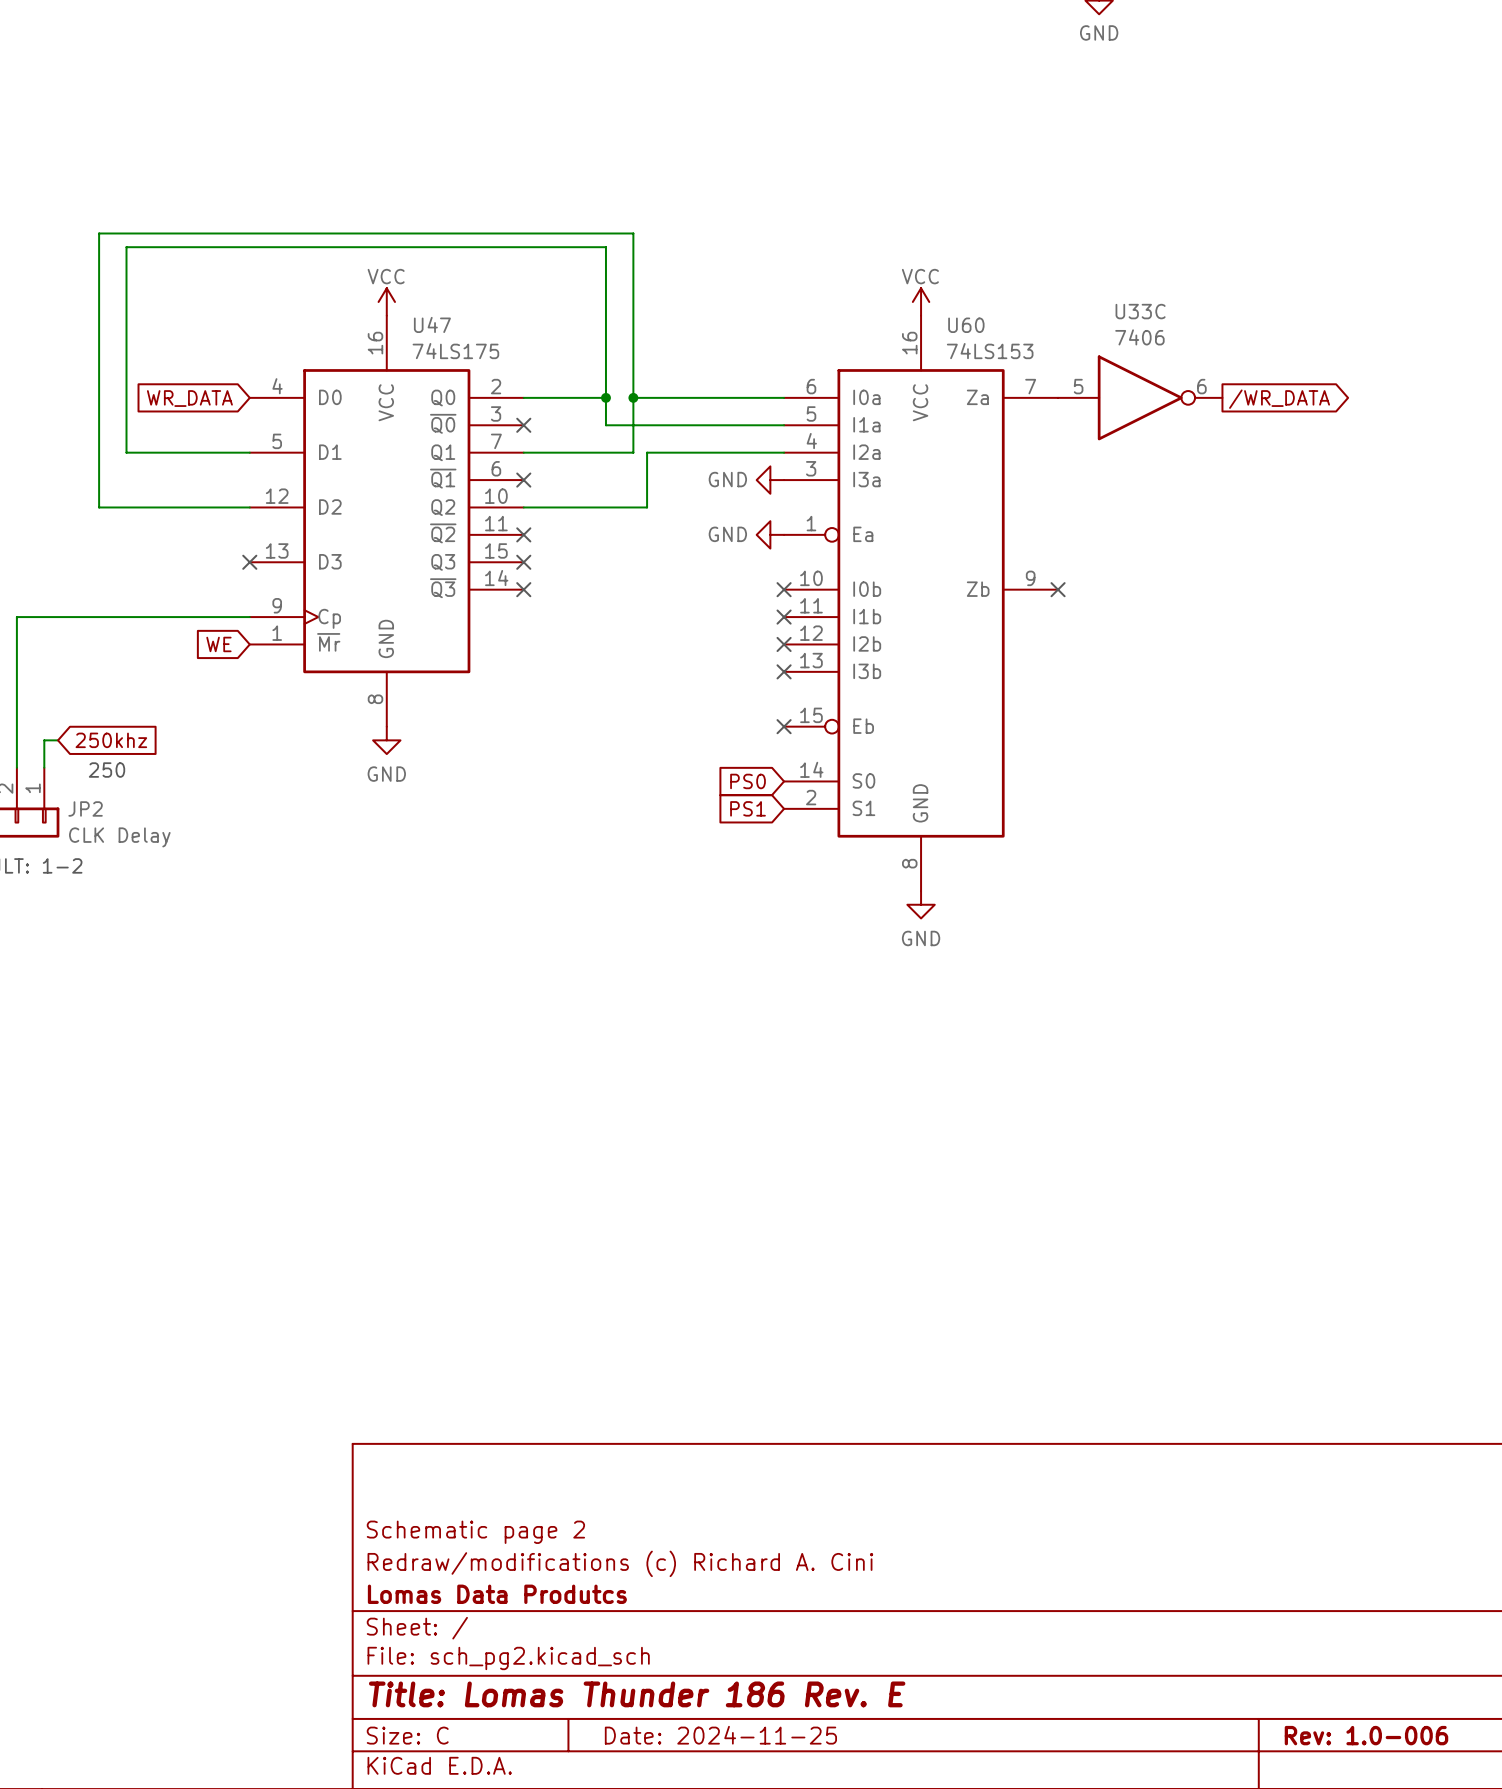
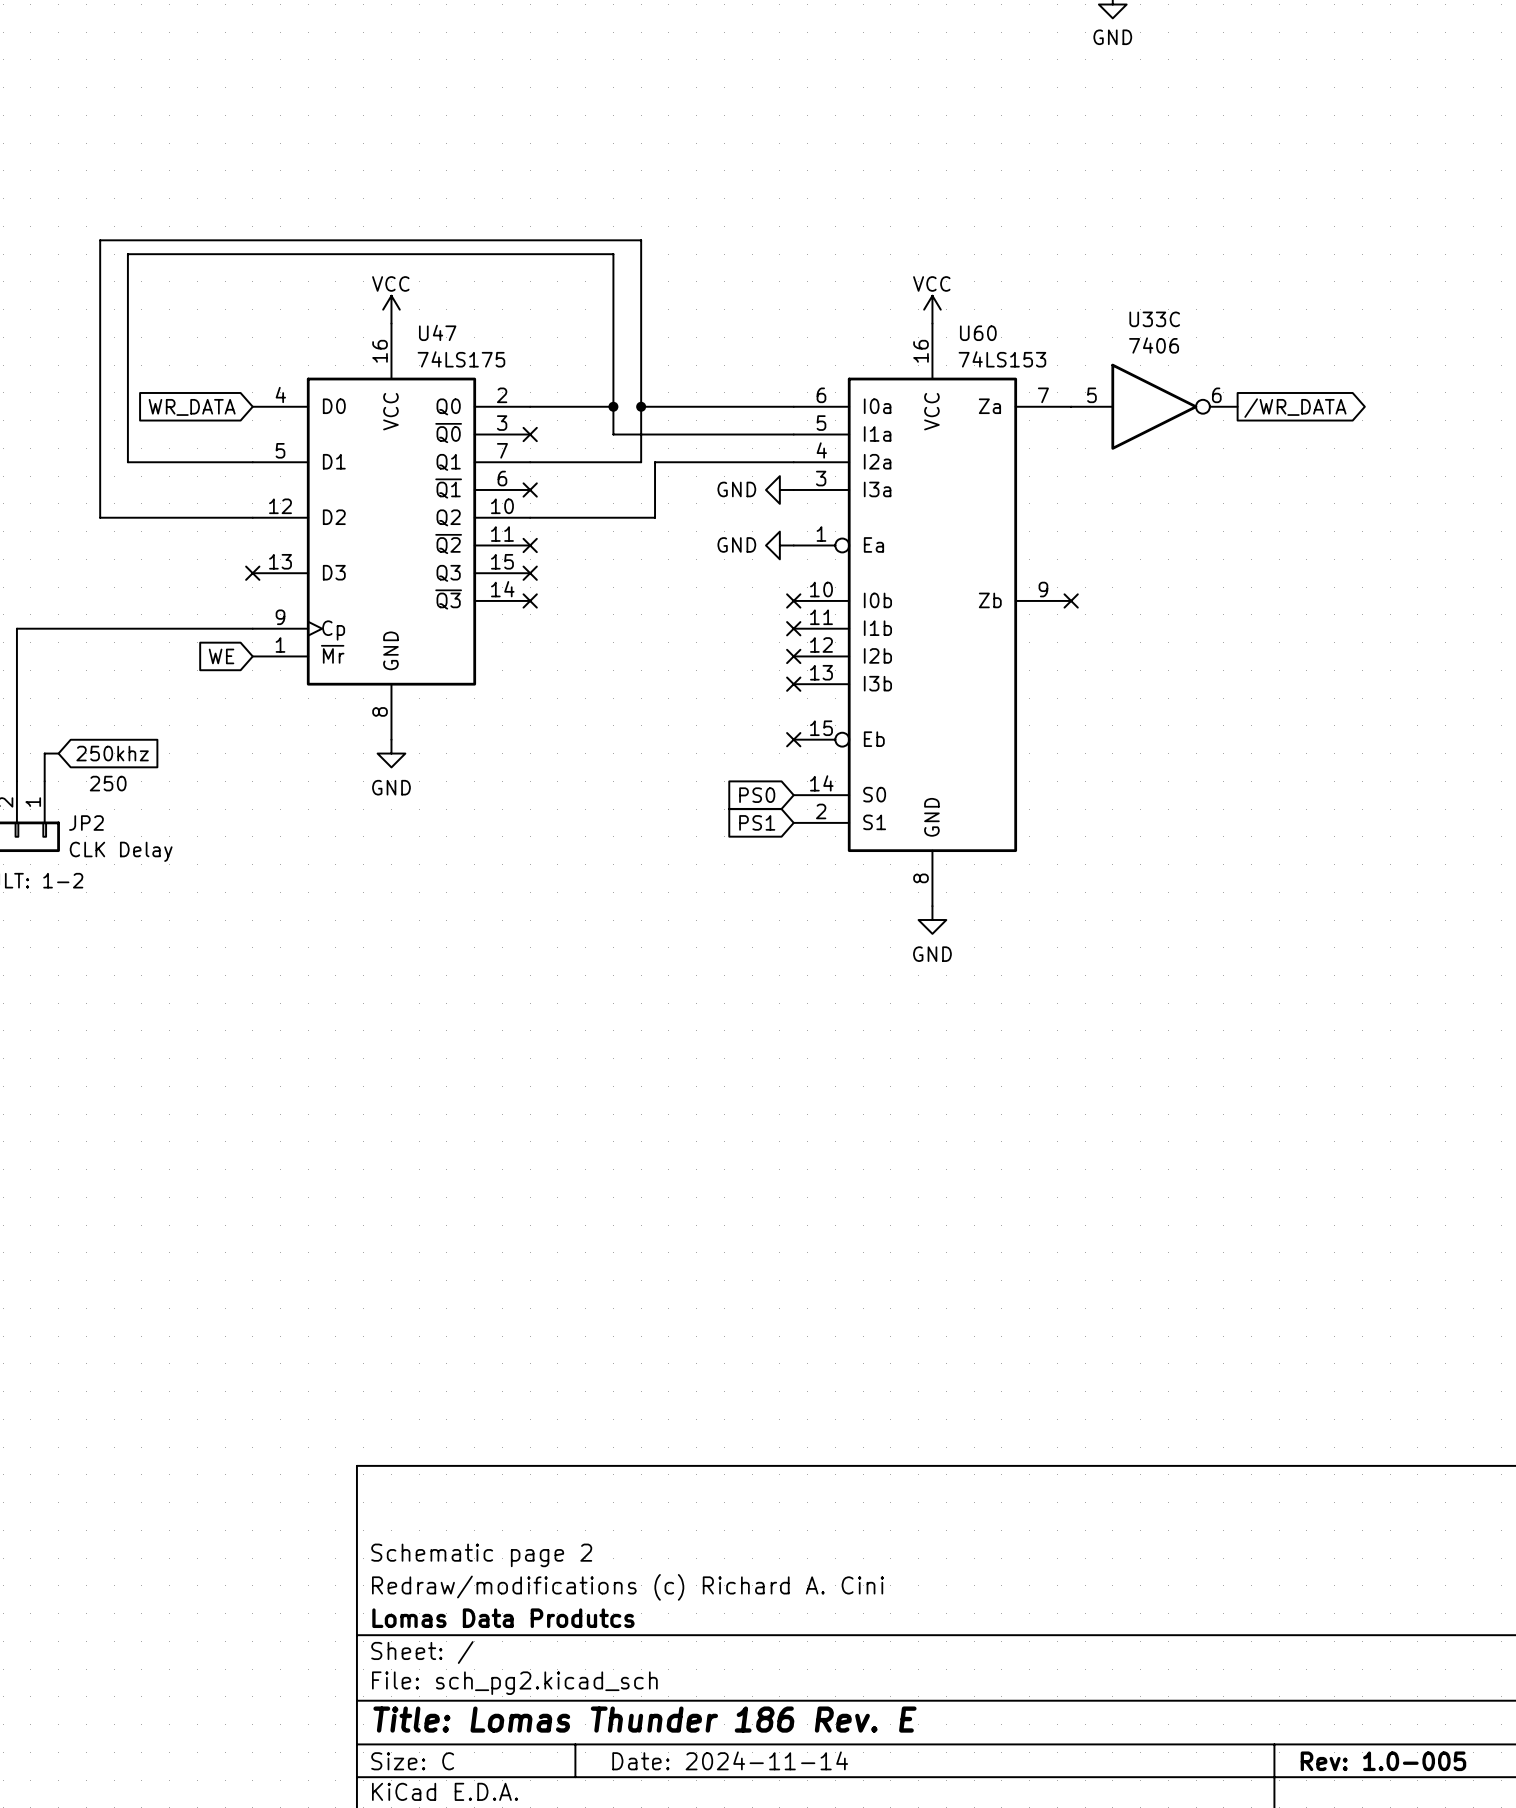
title block: Date: 2024-11-25 (720, 1735) -> Date: 2024-11-14 (730, 1760)
title block: Rev: 1.0-006 (1366, 1735) -> Rev: 1.0-005 (1383, 1761)

